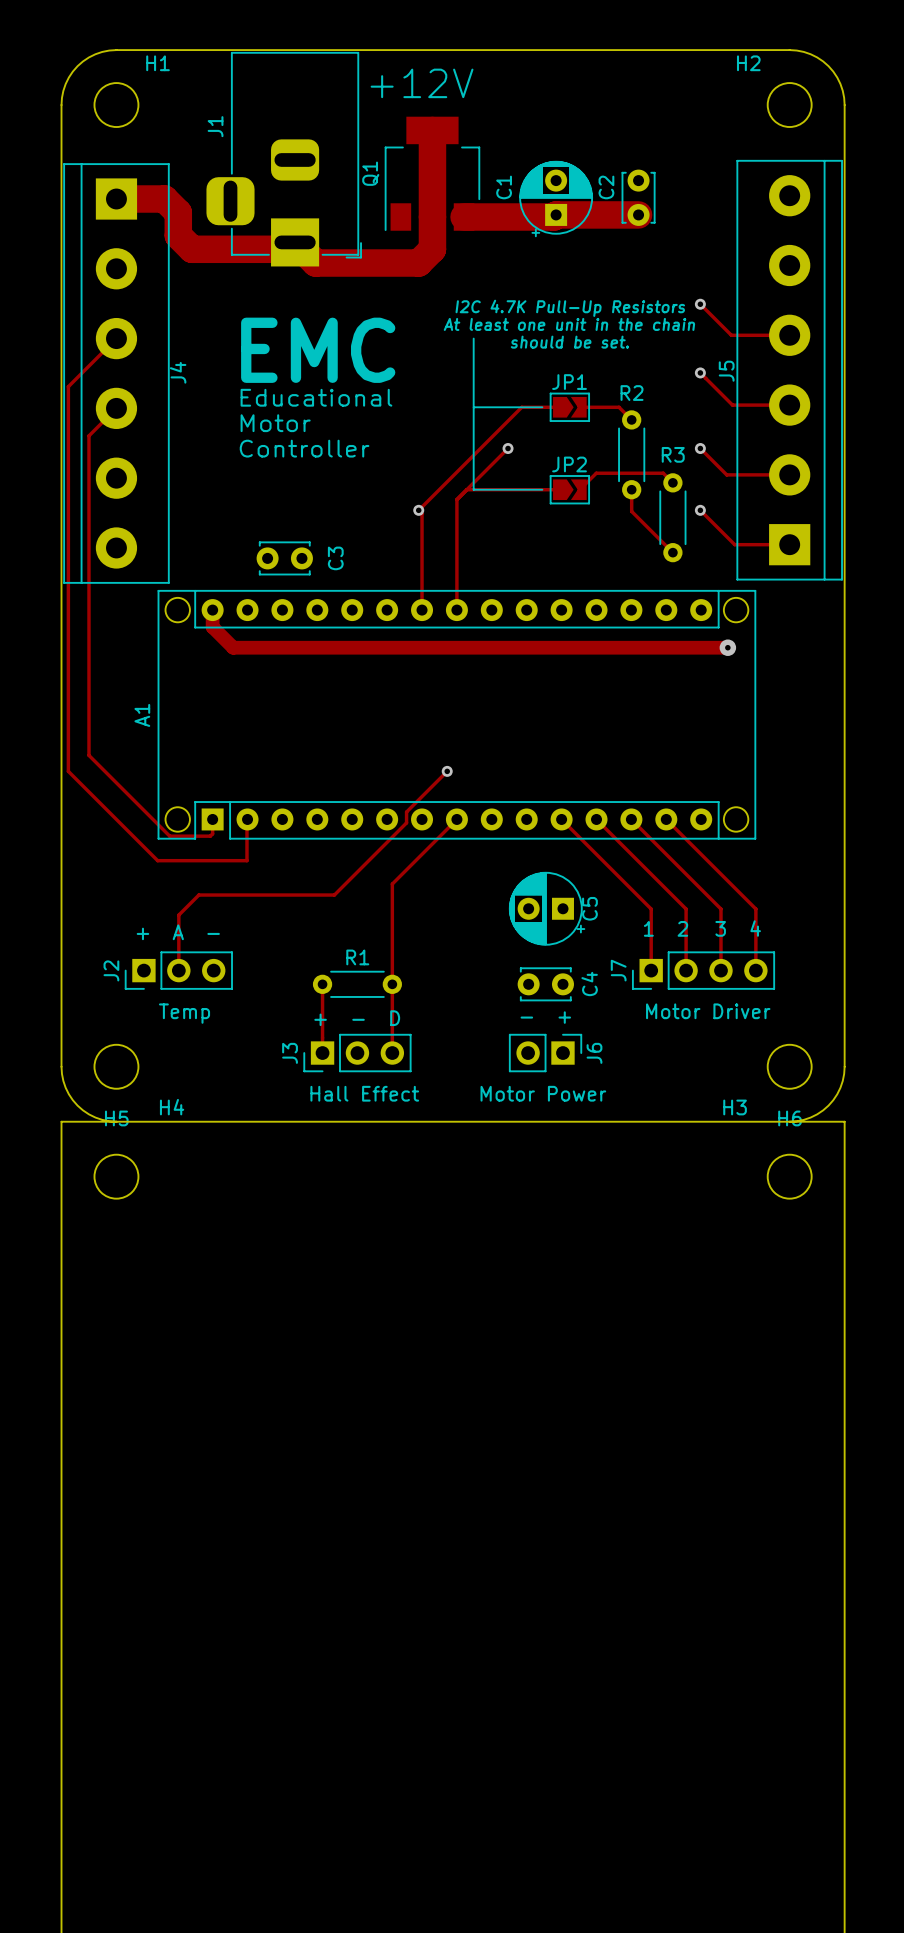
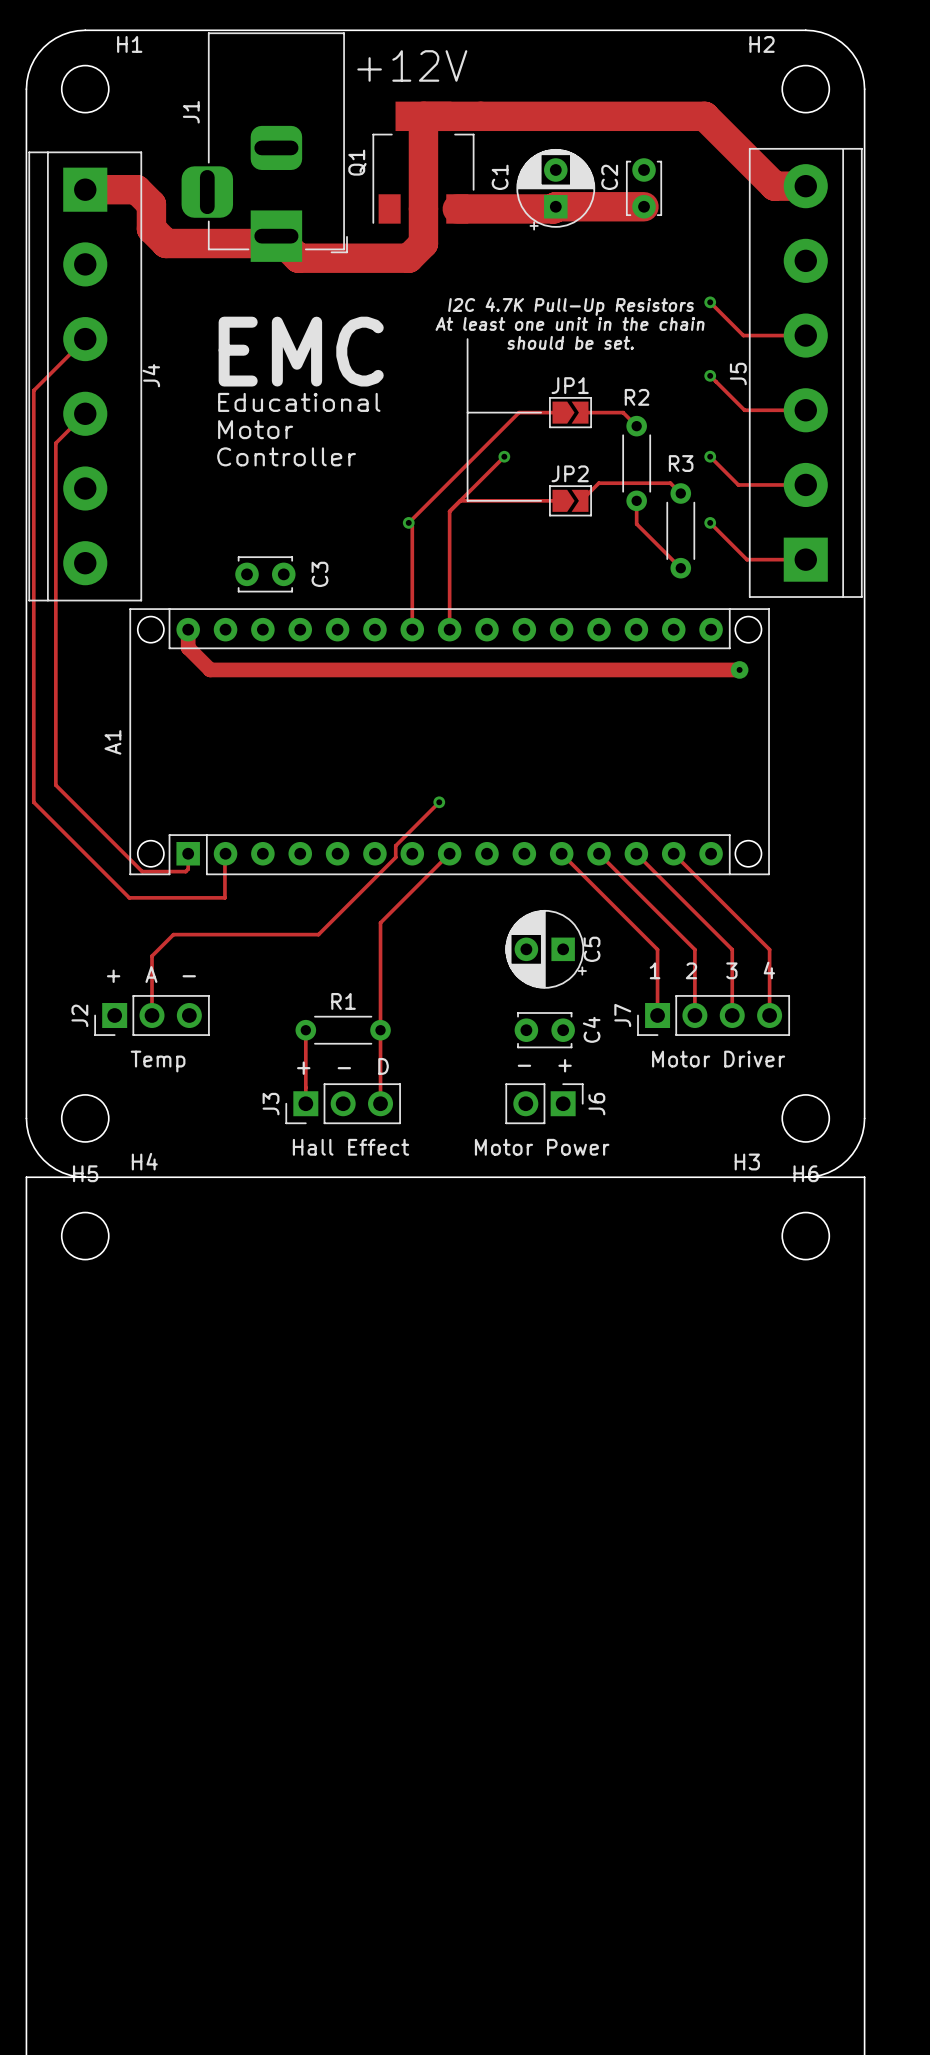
track: none -> (423, 116) (704, 116) (774, 186) (805, 186)

